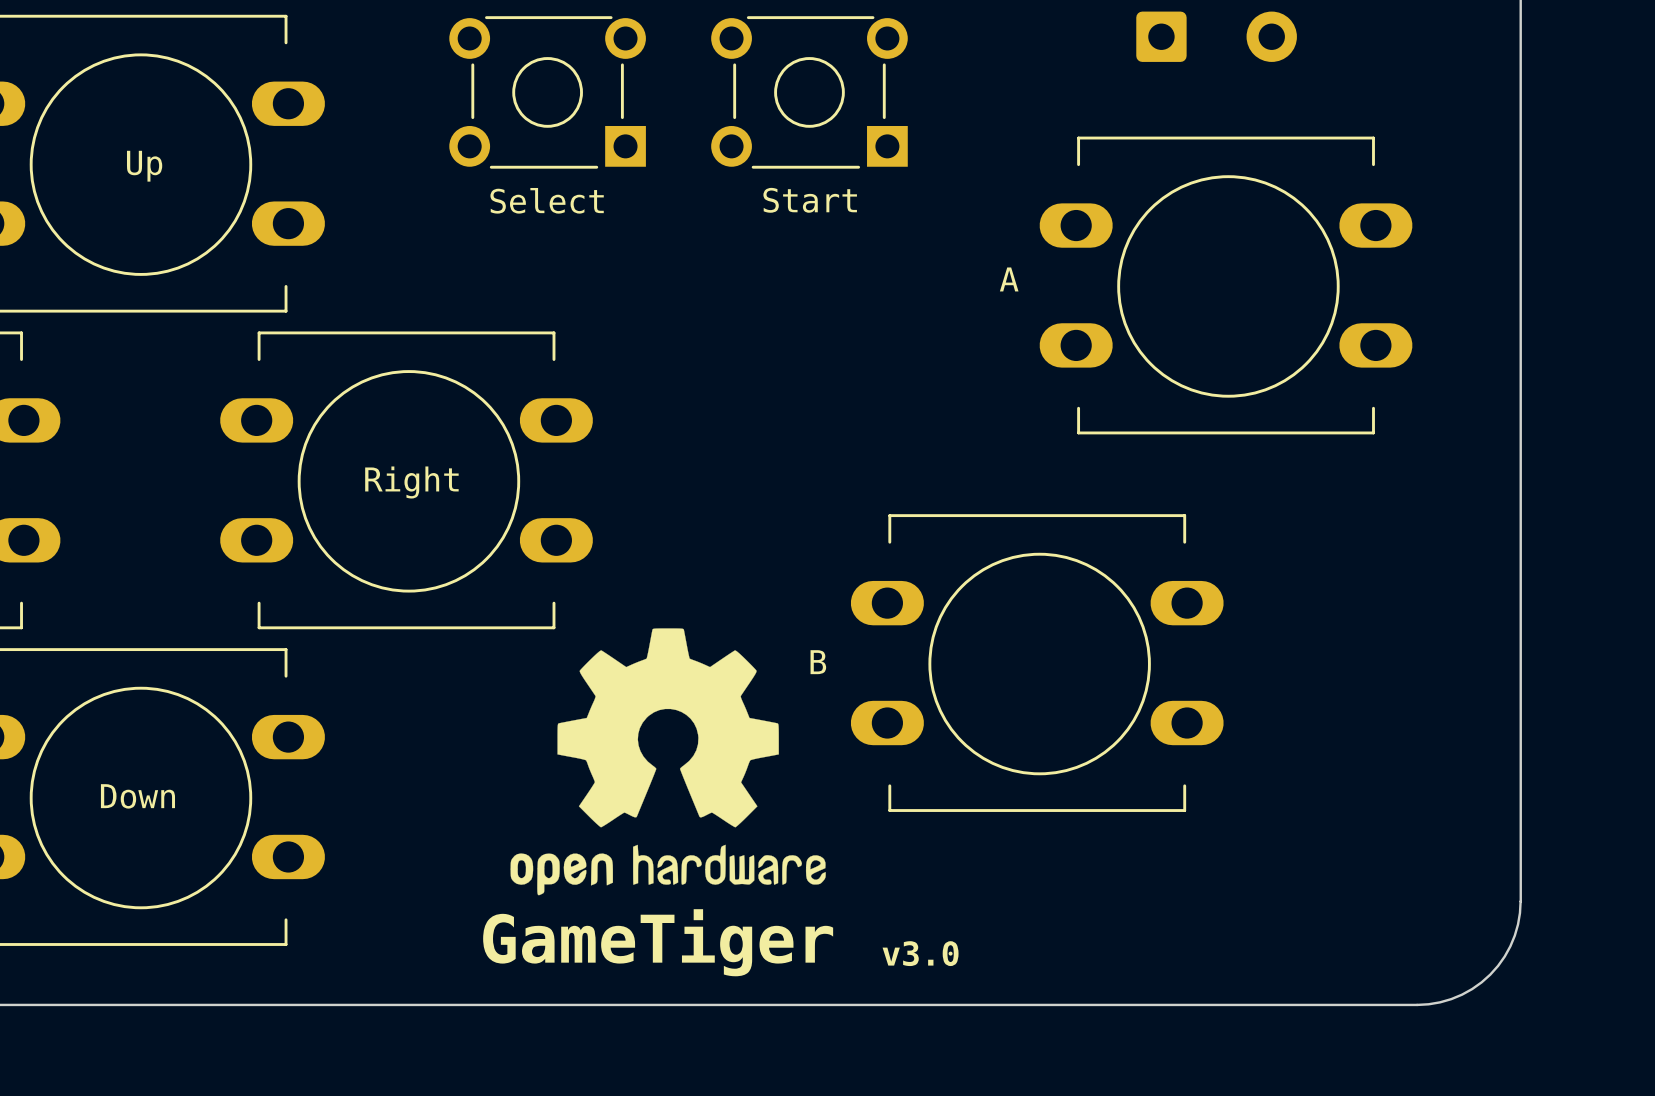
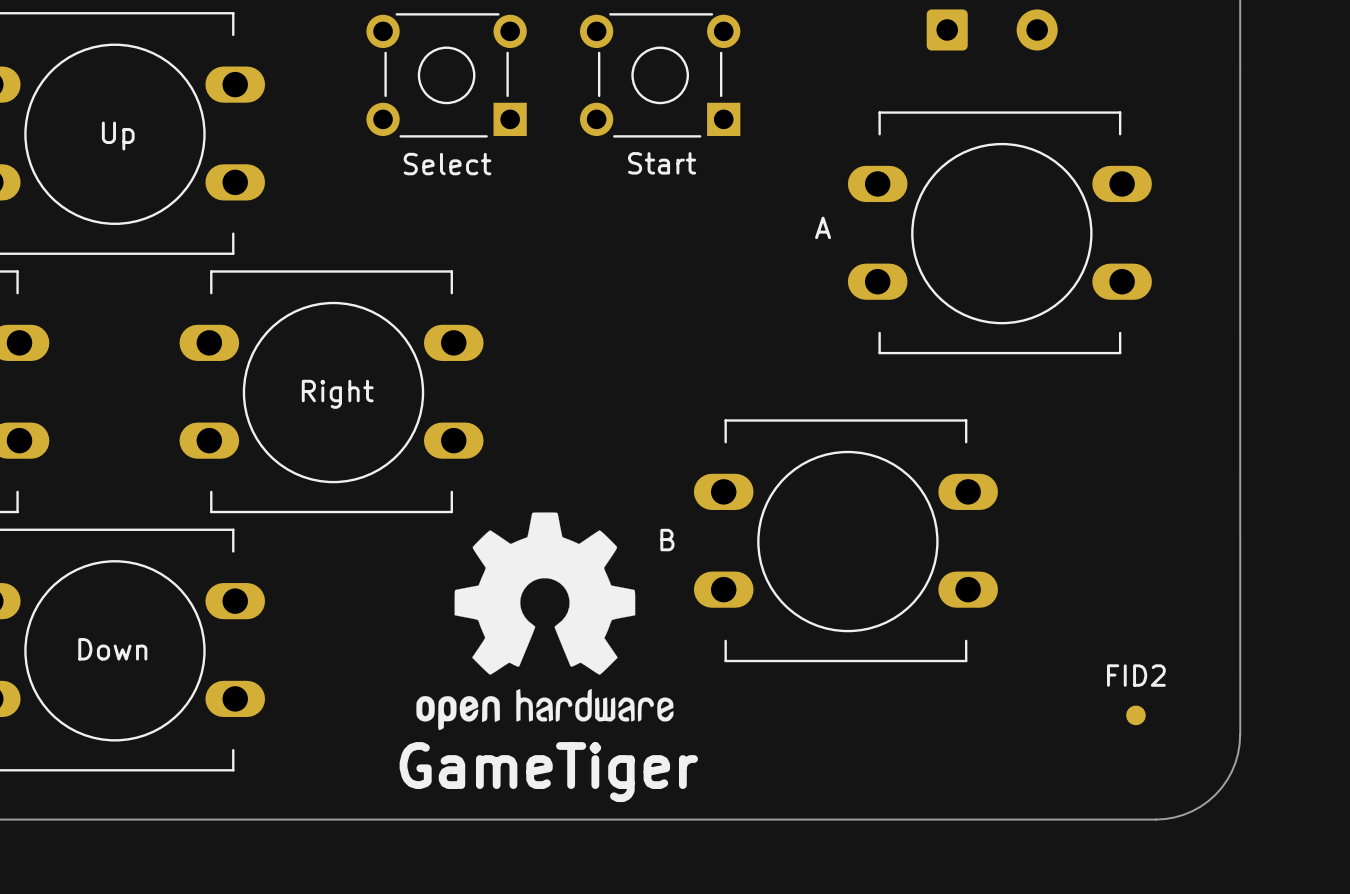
FID2: none -> (1135, 715)
text: v3.0 (920, 953) -> none

